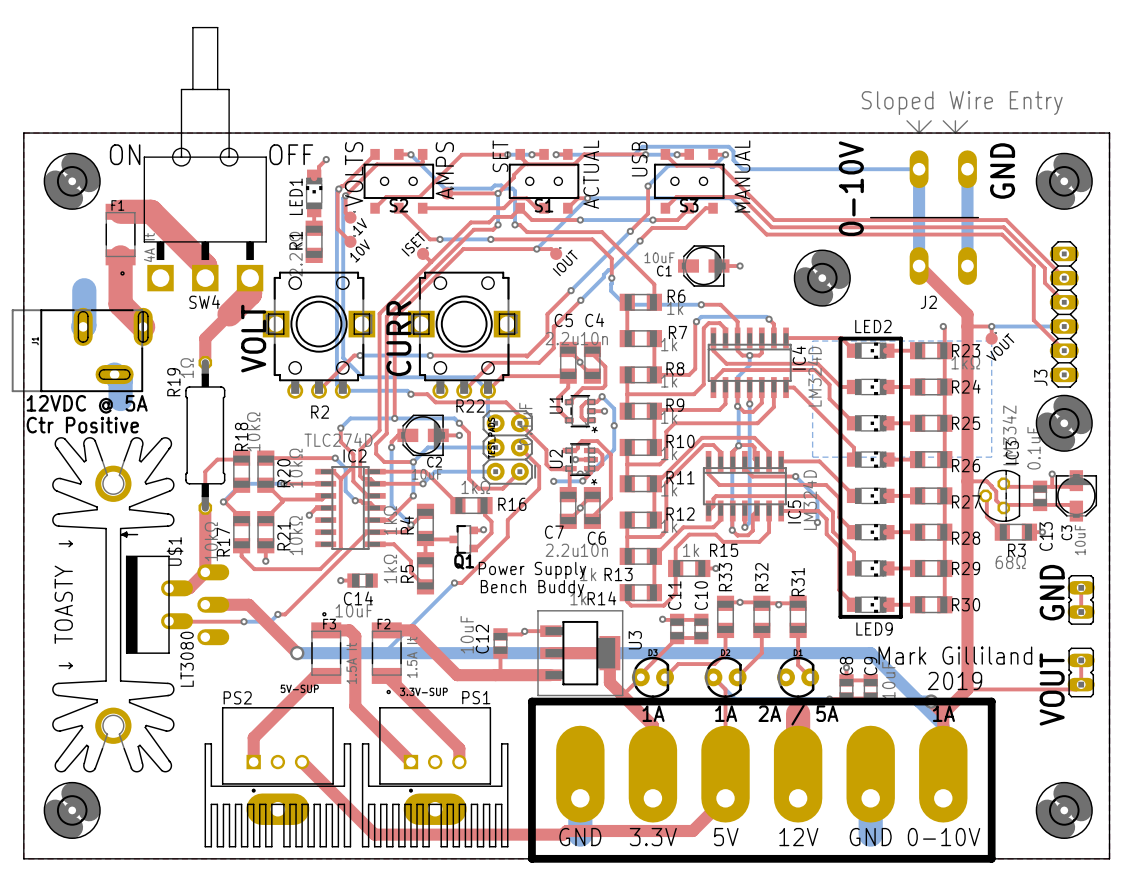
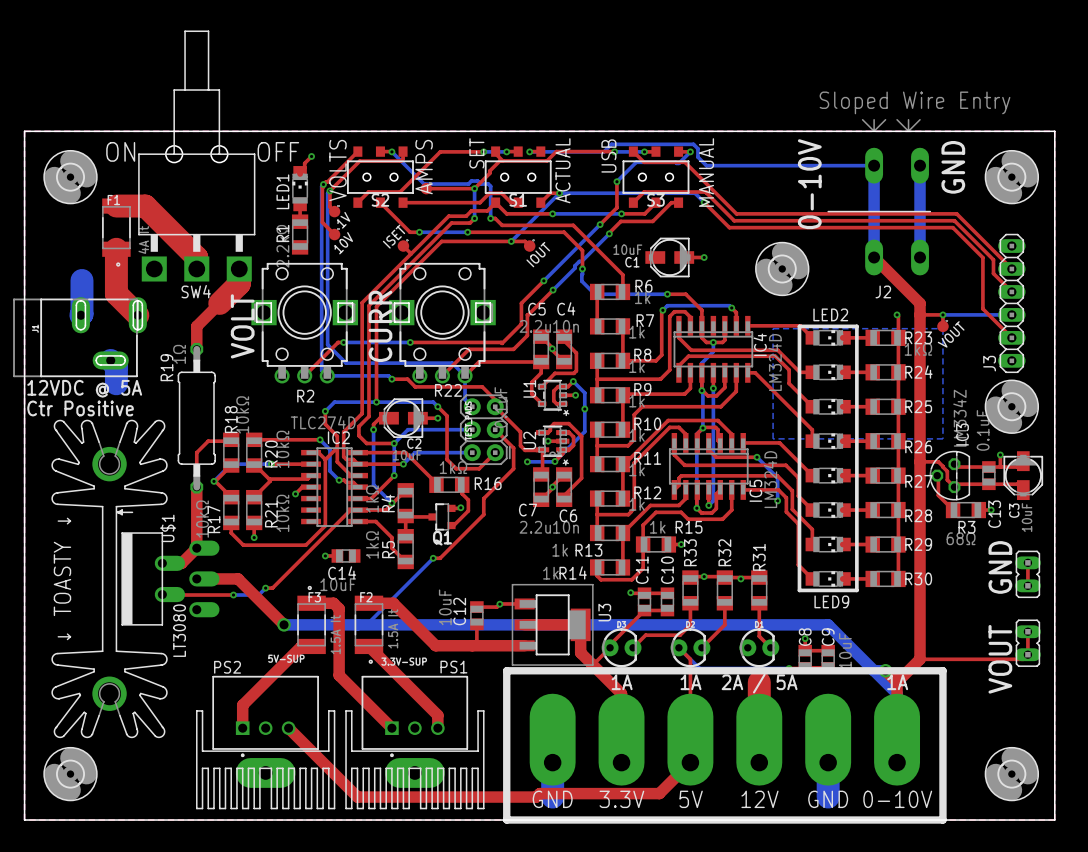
text: Power Supply (532, 570) -> none
text: Bench Buddy (532, 588) -> none
text: Mark Gilliland (955, 655) -> none
text: 2019 (955, 680) -> none

